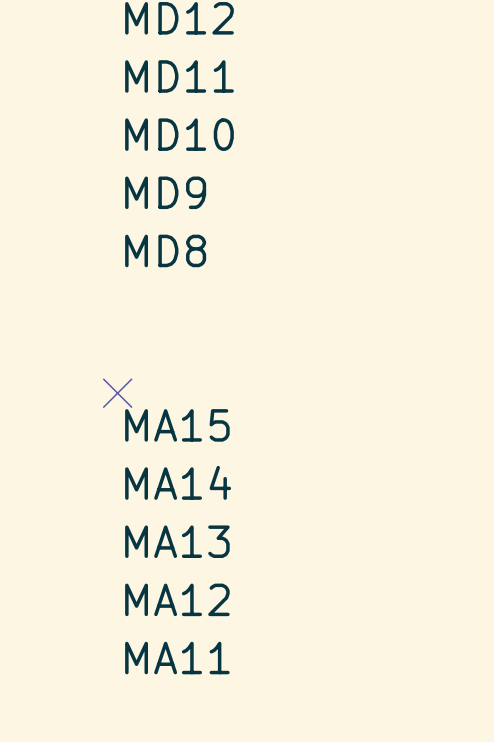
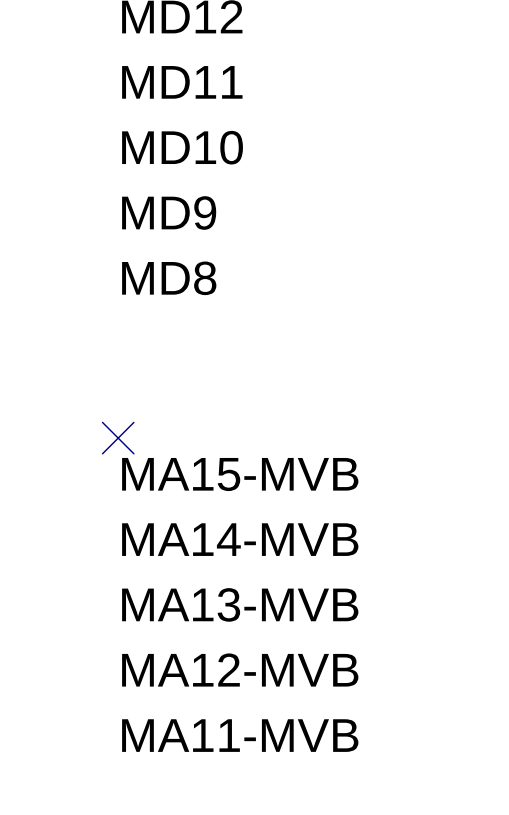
label: MA15 (177, 425) -> MA15-MVB (240, 474)
label: MA14 (178, 482) -> MA14-MVB (240, 539)
label: MA13 (177, 541) -> MA13-MVB (240, 604)
label: MA12 (177, 599) -> MA12-MVB (240, 670)
label: MA11 (177, 658) -> MA11-MVB (240, 735)

